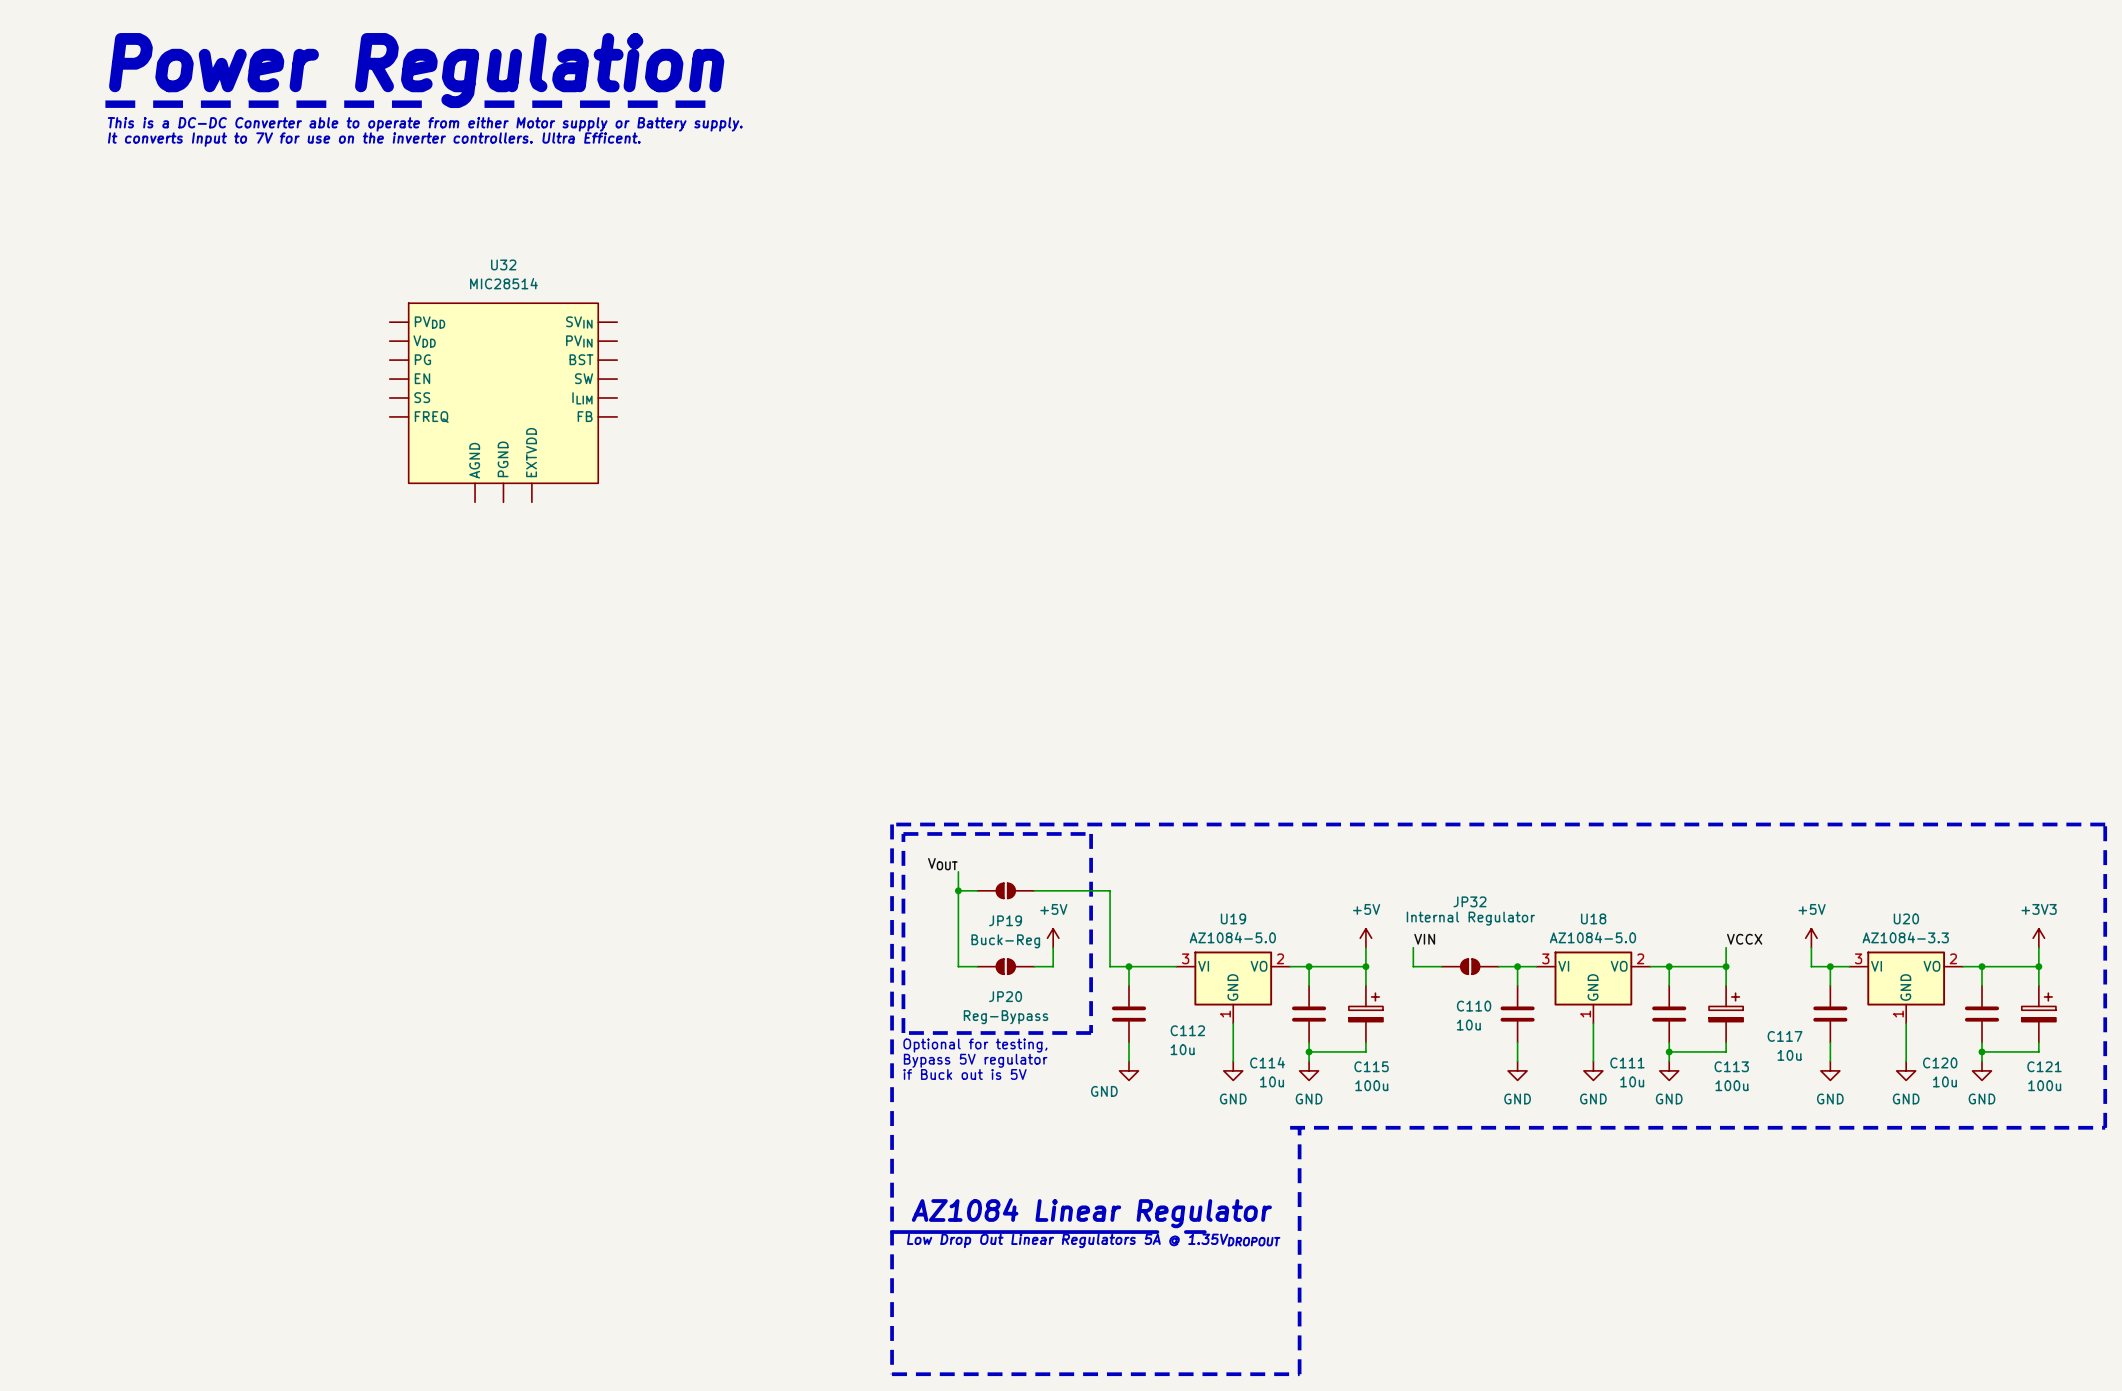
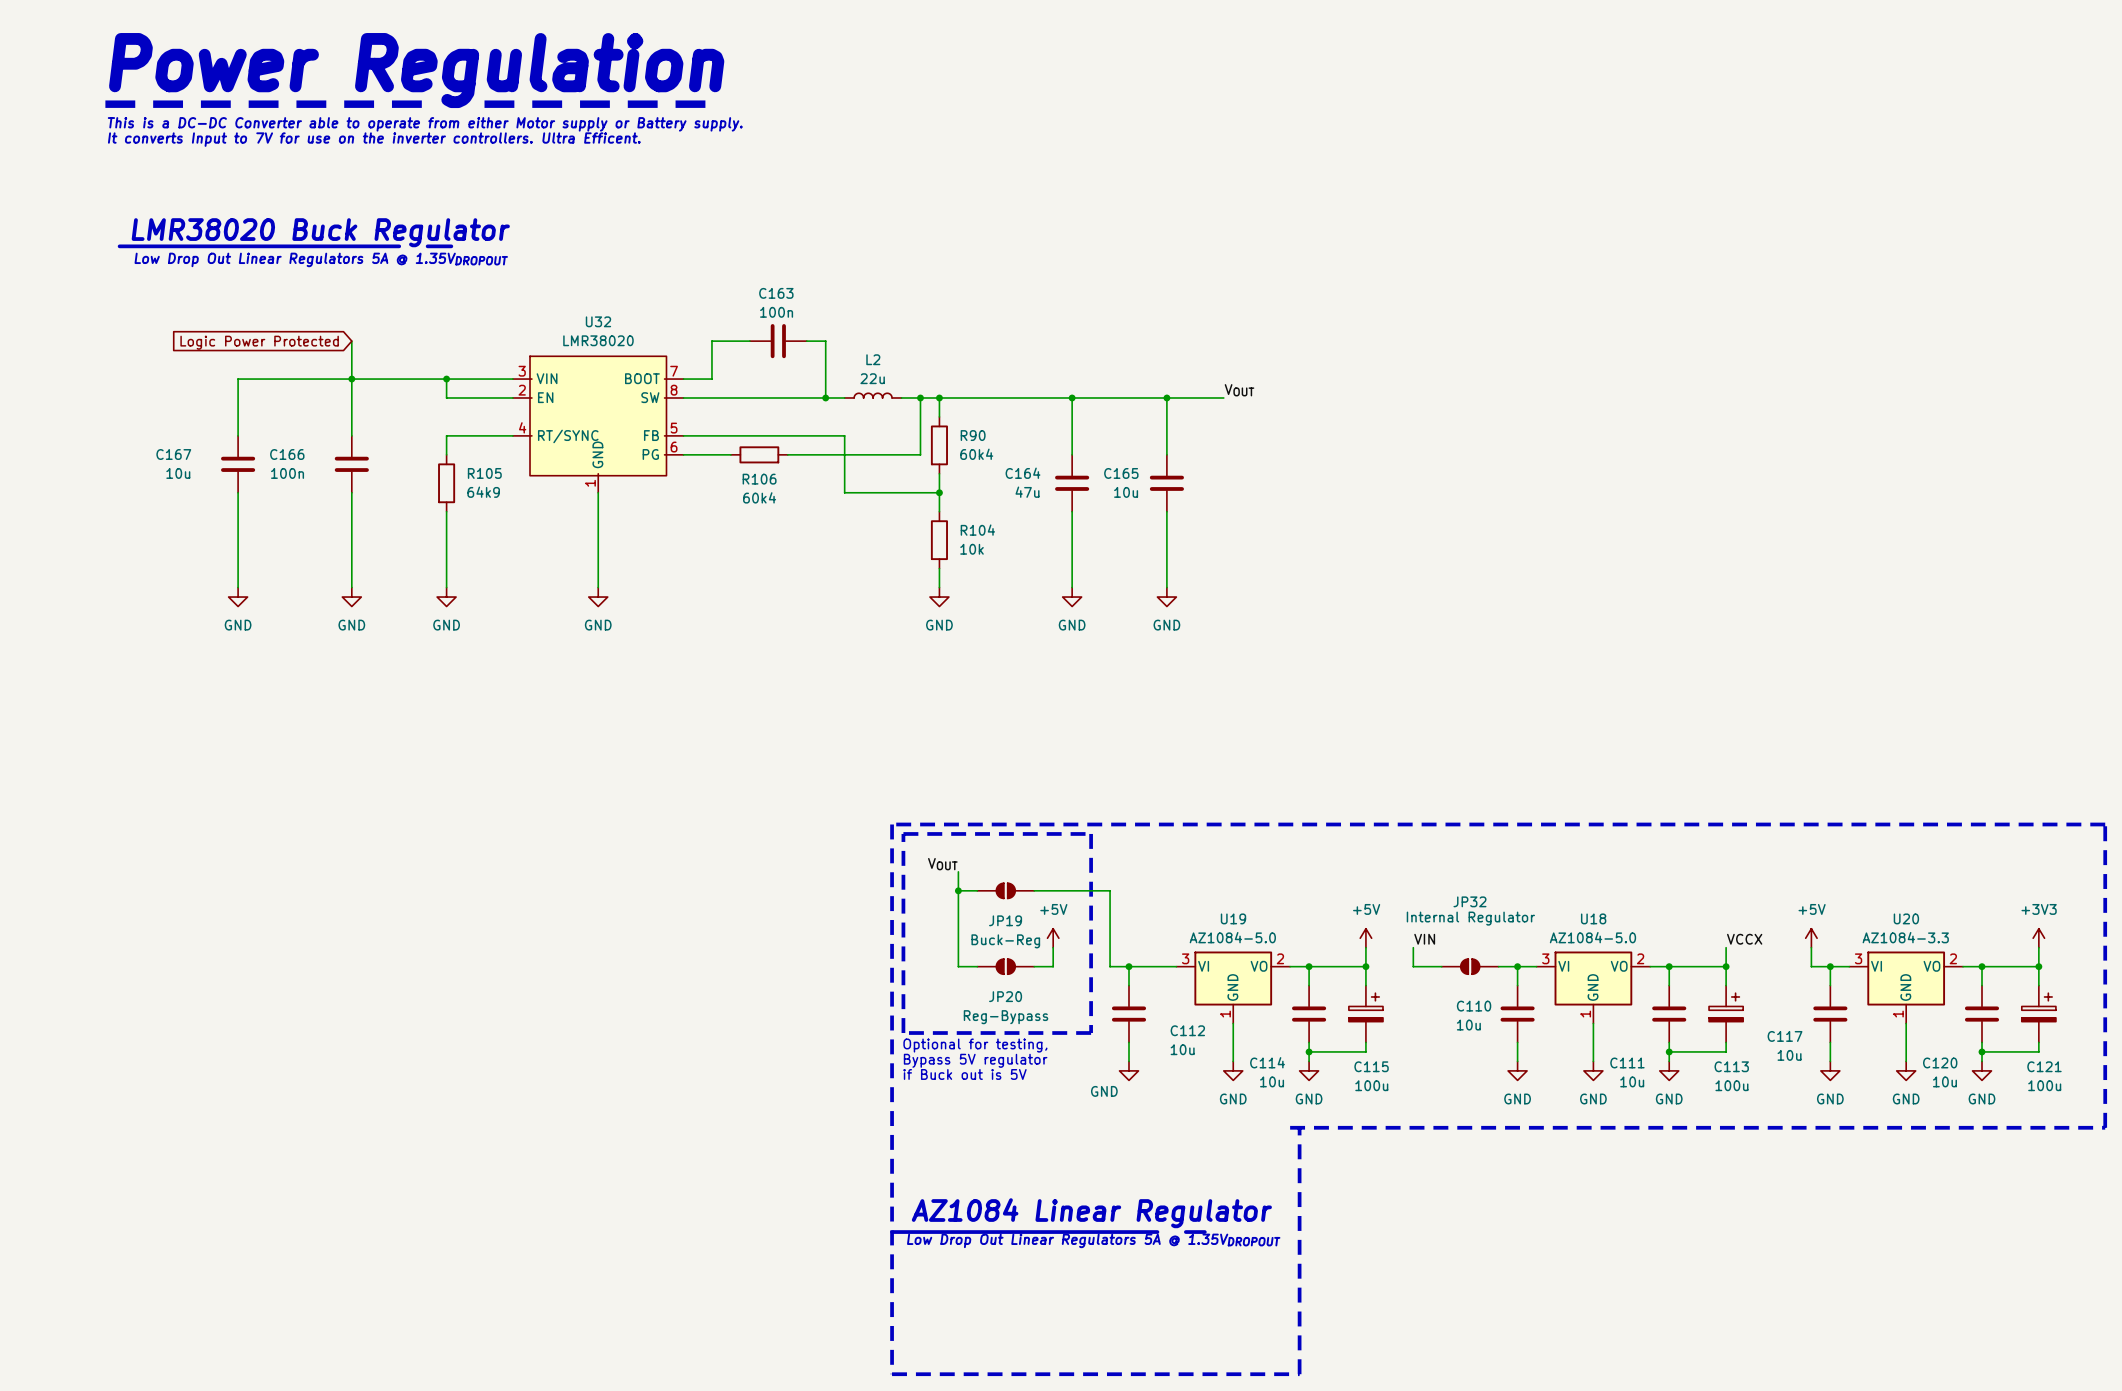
text: none -> LMR38020 Buck Regulator (320, 232)
line: none -> (119, 246) (399, 246)
line: none -> (427, 246) (451, 246)
text: none -> Low Drop Out Linear Regulators 5A @ 1.35VDROPOUT (321, 259)
U32 name position: U32 (503, 264) -> U32 (598, 321)
U32 value: MIC28514 (503, 283) -> LMR38020 (598, 340)
U32 symbol: [389, 303, 618, 503] -> [512, 356, 684, 493]
wire: none -> (351, 341) (351, 435)
wire: none -> (749, 341) (711, 341) (711, 379) (683, 379)
C163: none -> 100n (778, 341)
wire: none -> (806, 341) (825, 341) (825, 397)
global label: none -> Logic Power Protected (259, 342)
junction: none -> (351, 379)
junction: none -> (446, 379)
wire: none -> (512, 379) (238, 379) (238, 435)
label: none -> VOUT (1239, 390)
L2: none -> 22u (873, 395)
wire: none -> (683, 397) (844, 397)
junction: none -> (825, 397)
wire: none -> (901, 397) (1223, 397)
wire: none -> (920, 397) (920, 454) (787, 454)
junction: none -> (920, 397)
wire: none -> (939, 397) (939, 416)
junction: none -> (939, 397)
wire: none -> (1072, 397) (1072, 454)
junction: none -> (1072, 397)
wire: none -> (1166, 397) (1166, 454)
junction: none -> (1166, 397)
wire: none -> (683, 435) (844, 435) (844, 492) (939, 492)
R90: none -> 60k4 (939, 445)
wire: none -> (683, 454) (730, 454)
R106: none -> 60k4 (759, 454)
C167: none -> 10u (238, 464)
C166: none -> 100n (351, 464)
wire: none -> (939, 473) (939, 511)
R105: none -> 64k9 (446, 483)
C164: none -> 47u (1072, 483)
C165: none -> 10u (1166, 483)
wire: none -> (238, 492) (238, 587)
wire: none -> (351, 492) (351, 587)
wire: none -> (598, 492) (598, 587)
junction: none -> (939, 492)
wire: none -> (446, 511) (446, 587)
wire: none -> (1072, 511) (1072, 587)
wire: none -> (1166, 511) (1166, 587)
R104: none -> 10k (939, 540)
wire: none -> (939, 568) (939, 587)
power symbol: none -> GND (238, 597)
power symbol: none -> GND (351, 597)
power symbol: none -> GND (446, 597)
power symbol: none -> GND (598, 597)
power symbol: none -> GND (939, 597)
power symbol: none -> GND (1072, 597)
power symbol: none -> GND (1166, 597)

